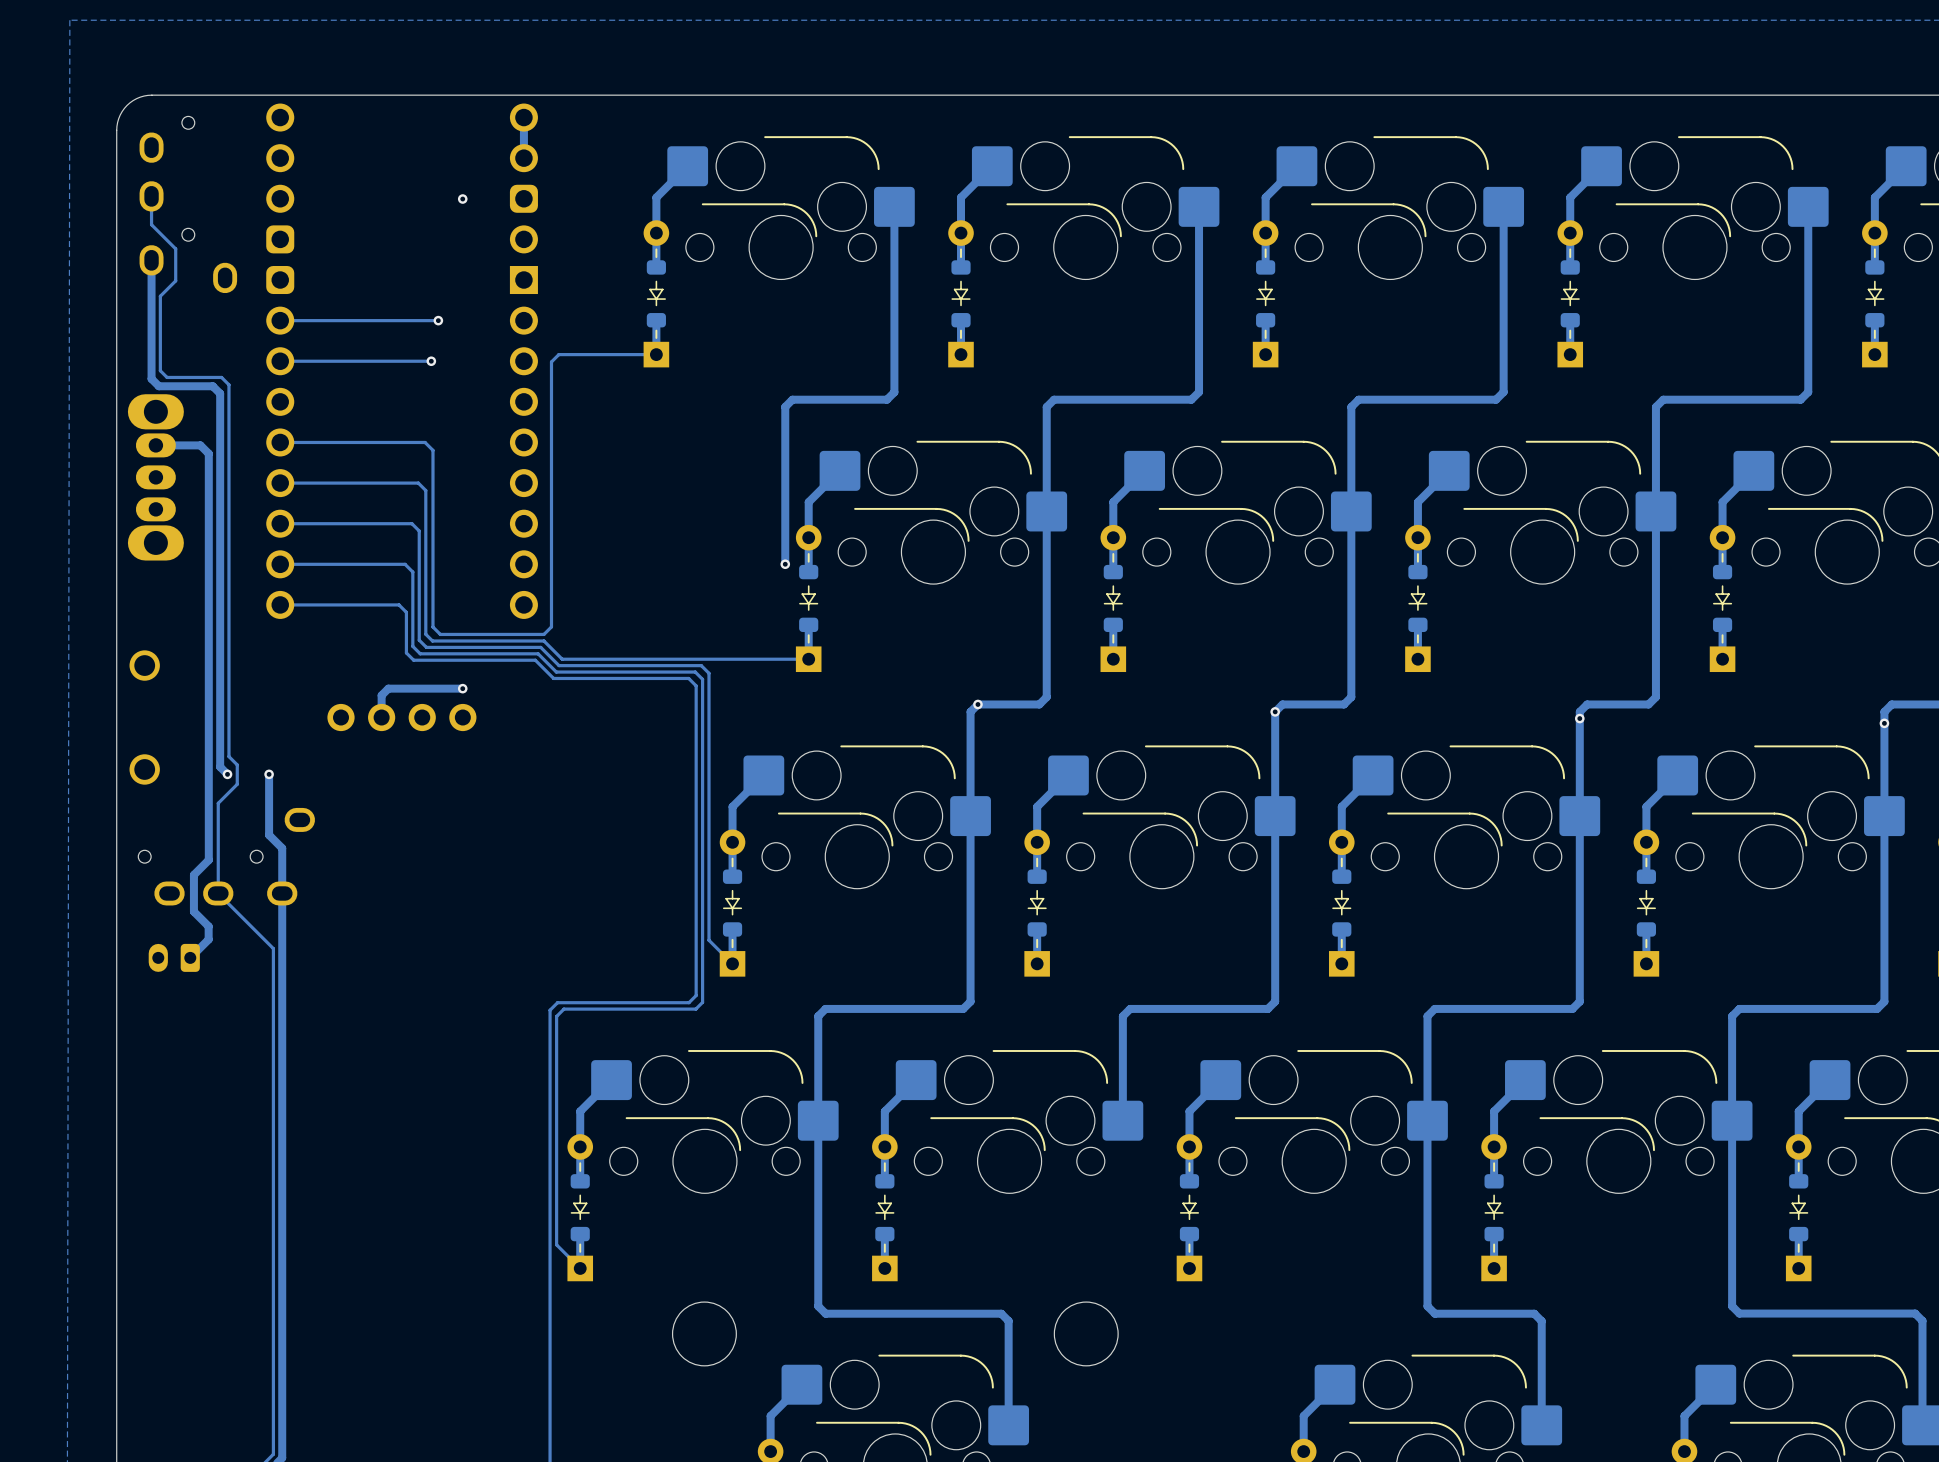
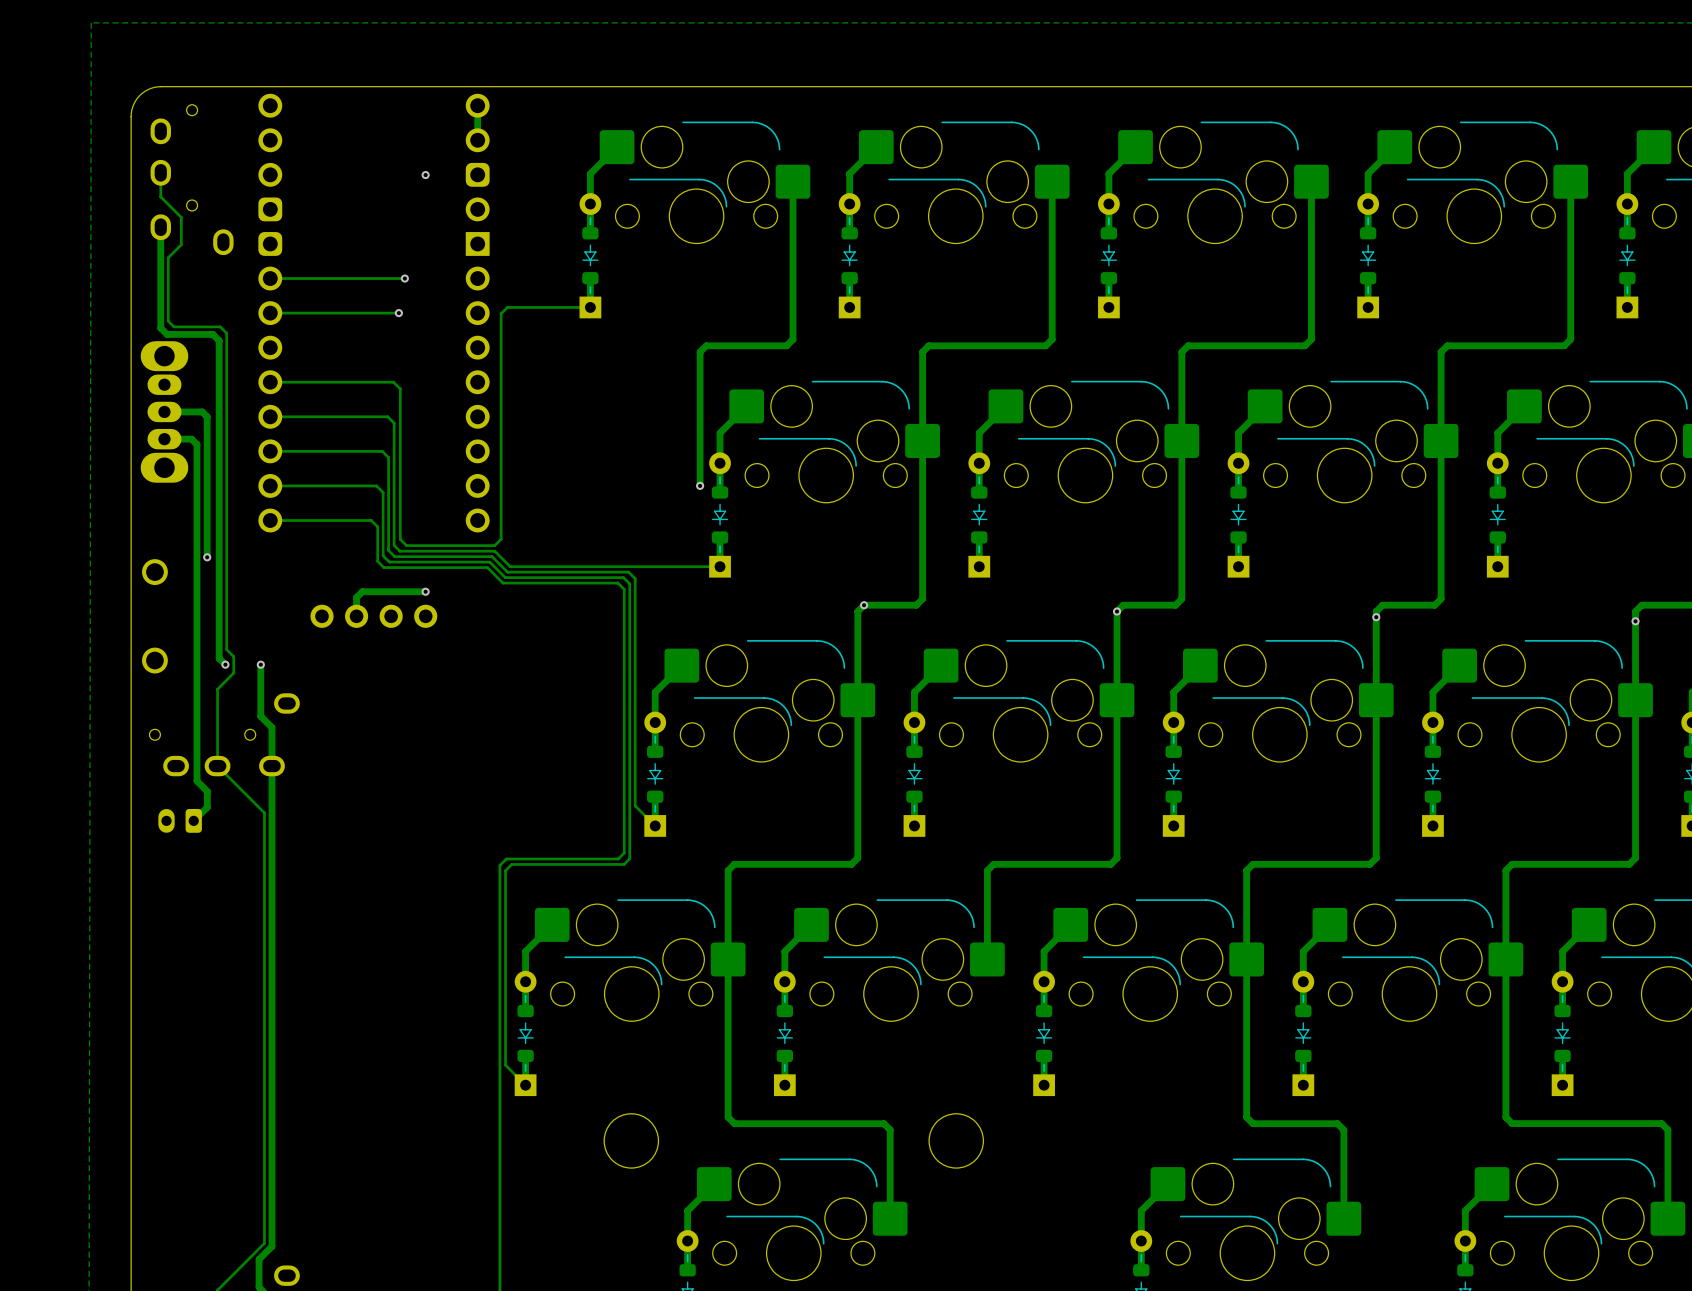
track: (155, 445) (200, 445) (208, 453) (208, 860) (193, 874) (193, 911) (208, 926) (208, 939) (206, 941) -> (164, 439) (191, 439) (196, 444) (196, 781) (207, 791) (207, 807)
track: none -> (164, 411) (202, 411) (207, 416) (207, 557)
via: none -> (207, 557)

